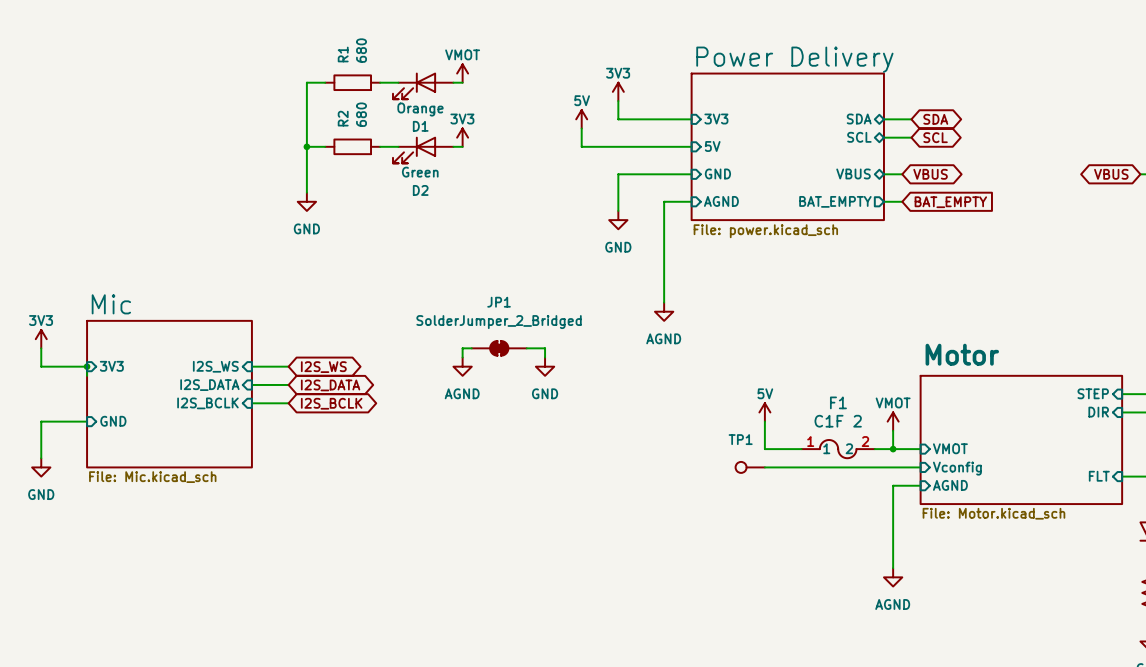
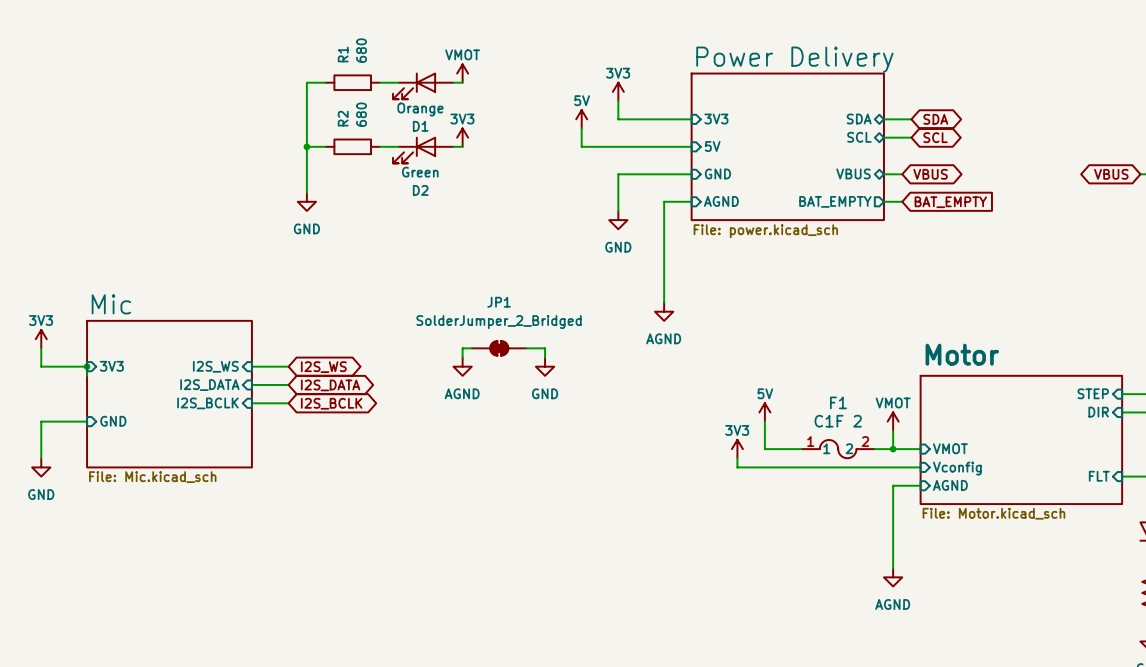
power symbol: none -> 3V3 (737, 449)
TP1: (750, 467) -> none

